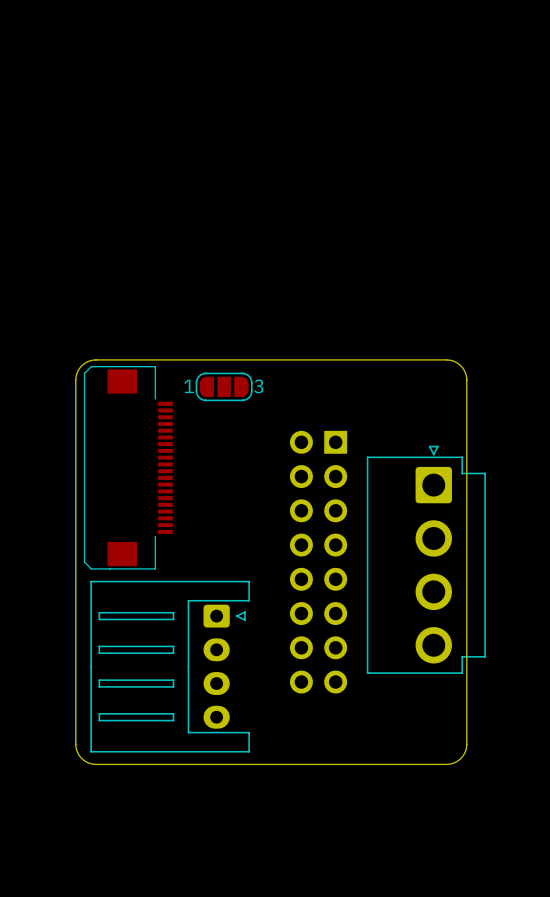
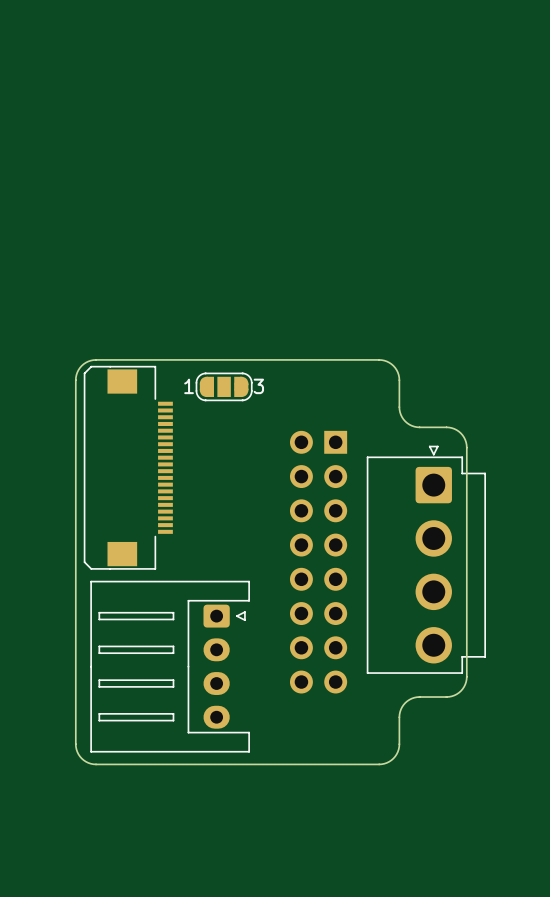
board edge: (379, 359) (449, 360) (460, 365) (466, 377) (466, 447) -> (379, 359) (391, 364) (397, 372) (399, 409) (405, 421) (416, 427) (454, 428) (462, 435) (466, 447)
board edge: (466, 676) (466, 746) (460, 758) (449, 764) (379, 764) -> (466, 676) (462, 689) (454, 695) (416, 697) (405, 702) (399, 714) (397, 751) (389, 761) (379, 764)

